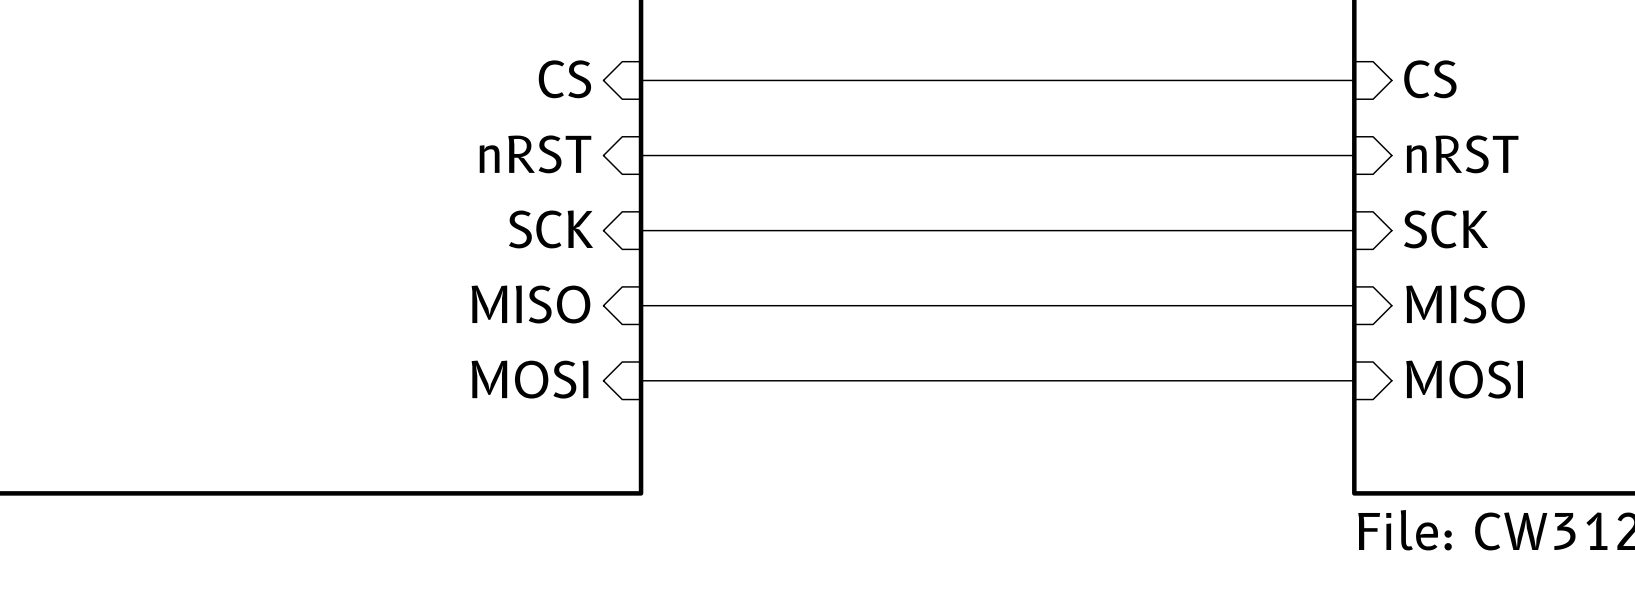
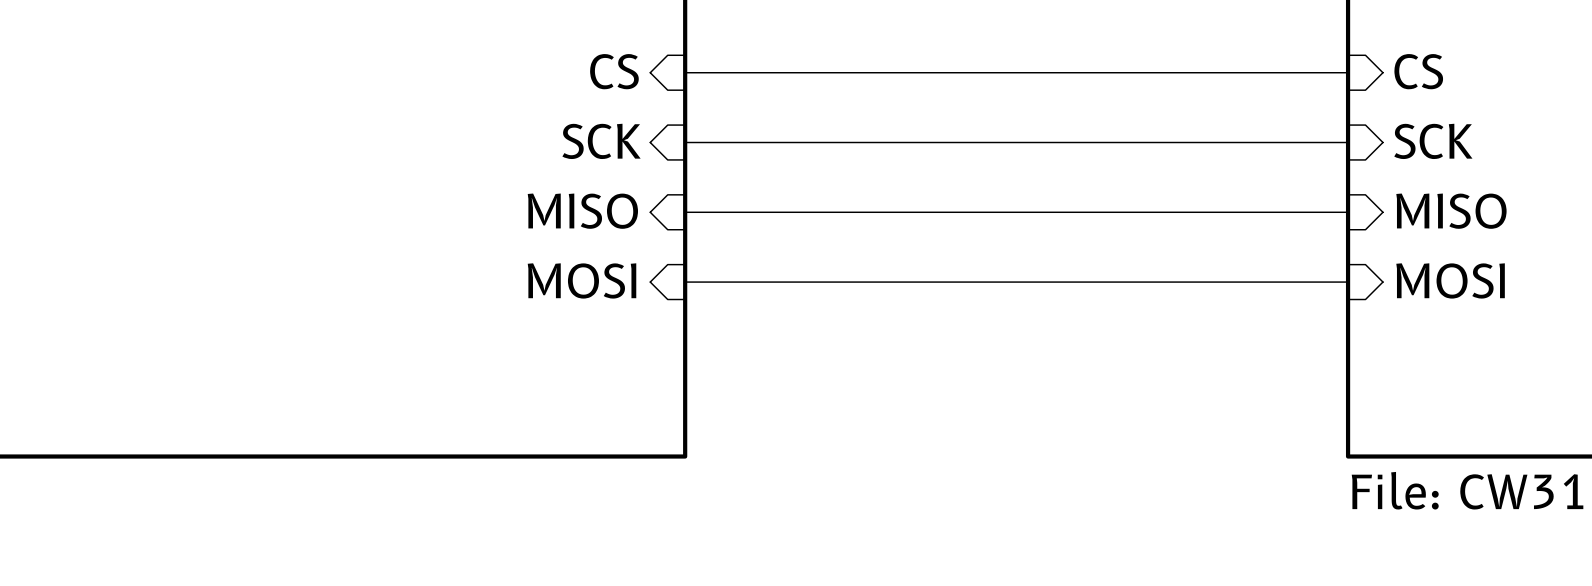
sheet pin: nRST (535, 154) -> SCK (601, 141)
sheet pin: nRST (1462, 154) -> SCK (1433, 141)
sheet pin: SCK (551, 229) -> MISO (582, 211)
sheet pin: SCK (1446, 229) -> MISO (1451, 211)
sheet pin: MISO (530, 304) -> MOSI (582, 280)
sheet pin: MISO (1465, 304) -> MOSI (1450, 280)
sheet pin: MOSI (530, 379) -> none
sheet pin: MOSI (1464, 379) -> none
wire: (641, 380) (1354, 380) -> none

